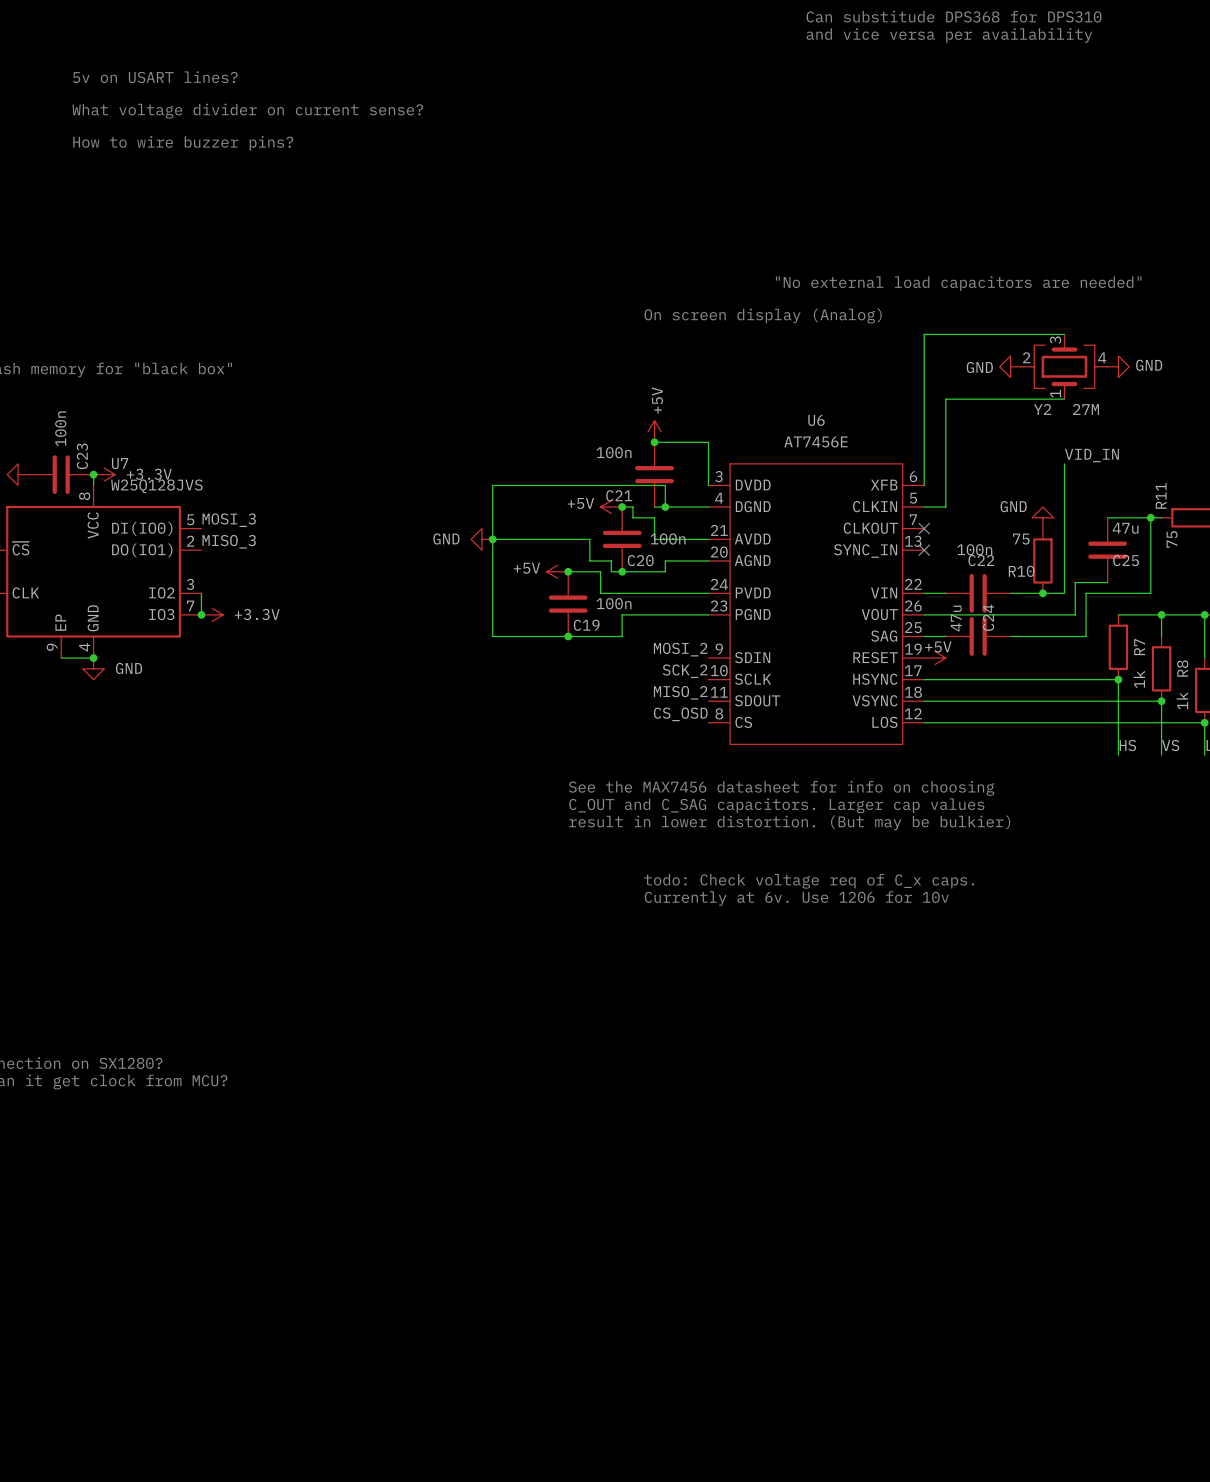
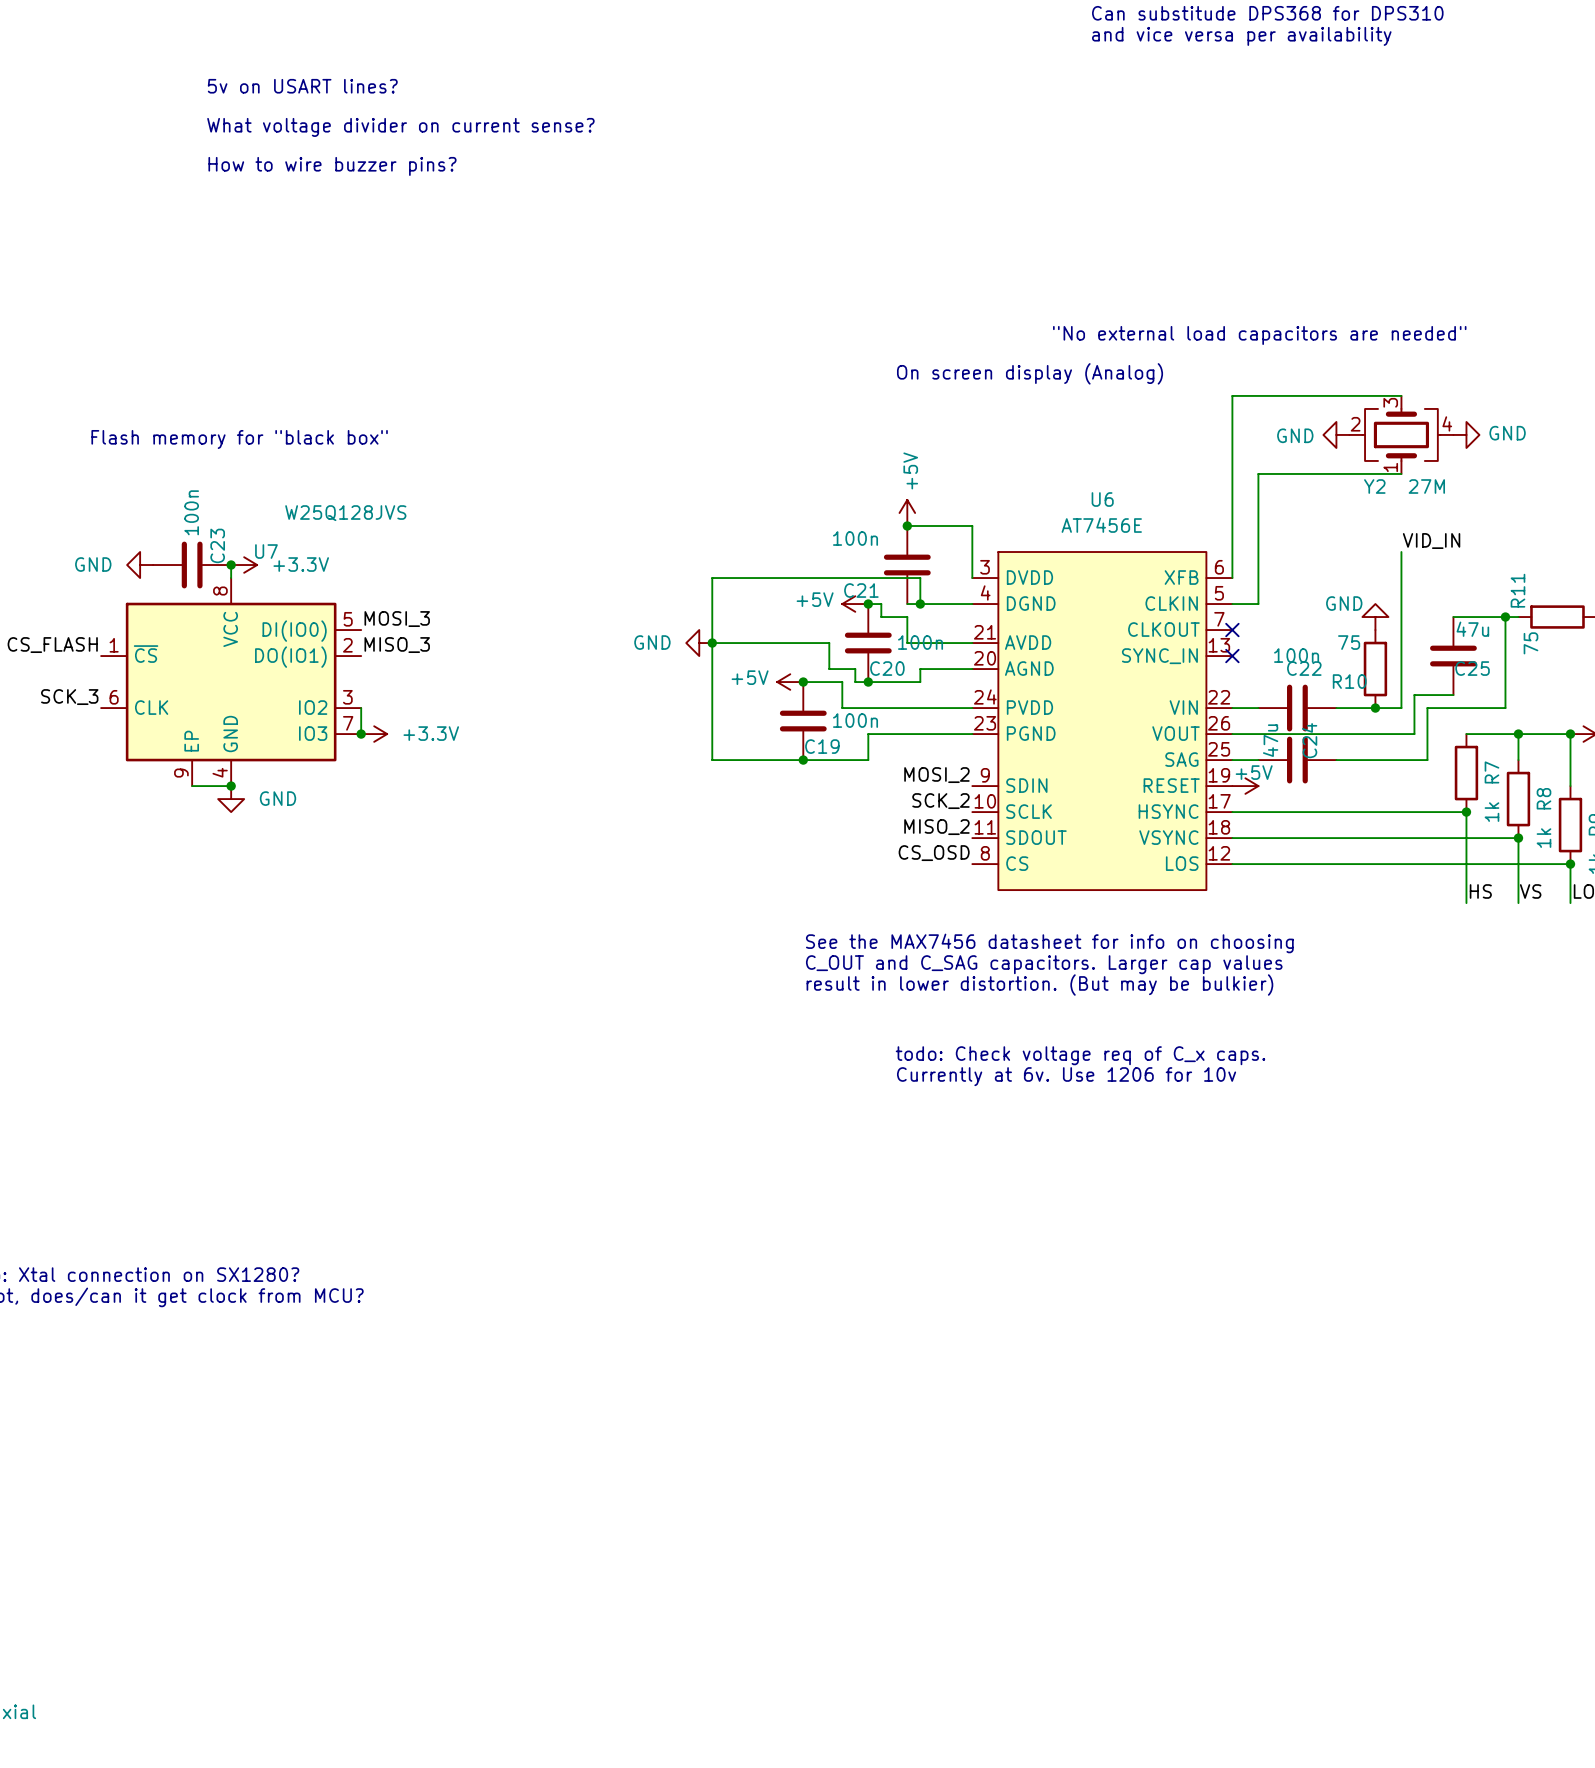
U7 value position: W25Q128JVS (156, 486) -> W25Q128JVS (345, 513)

